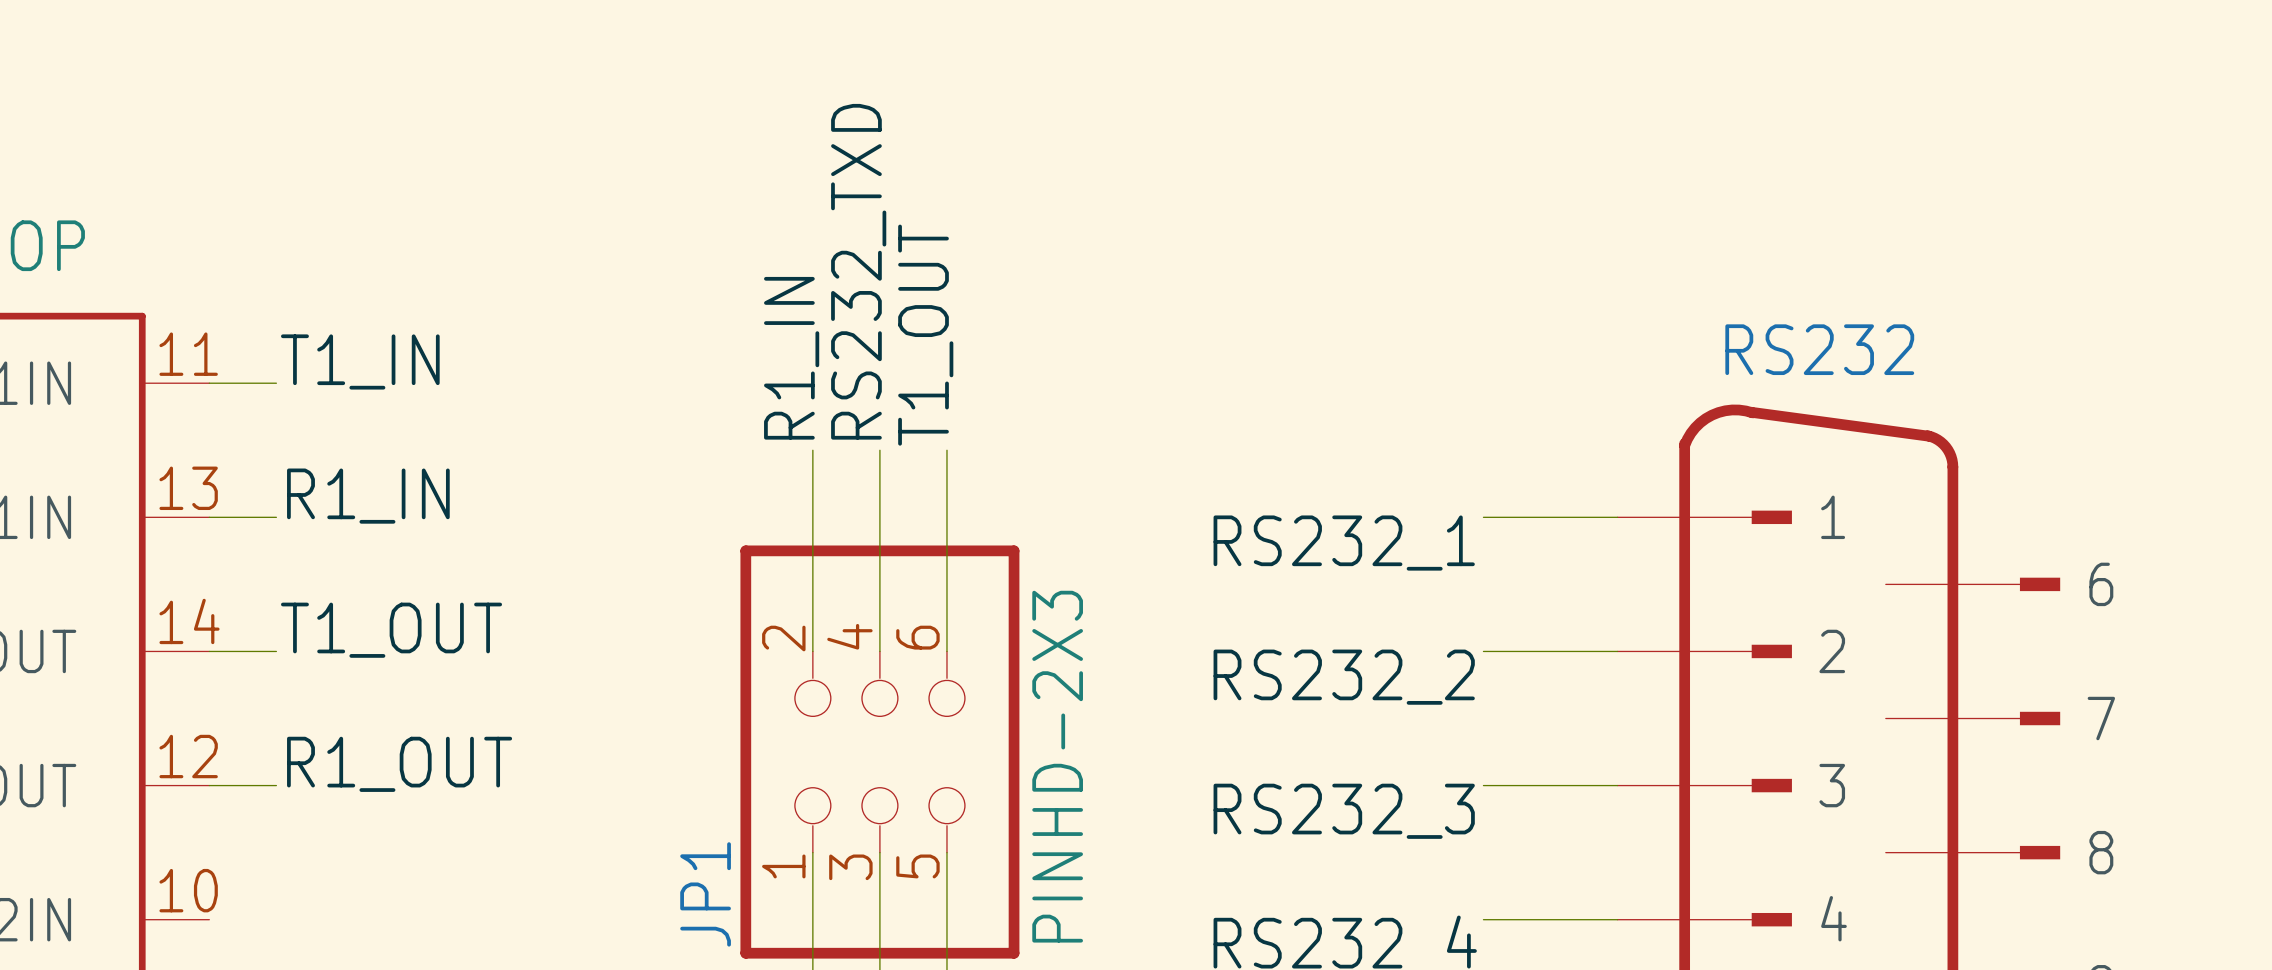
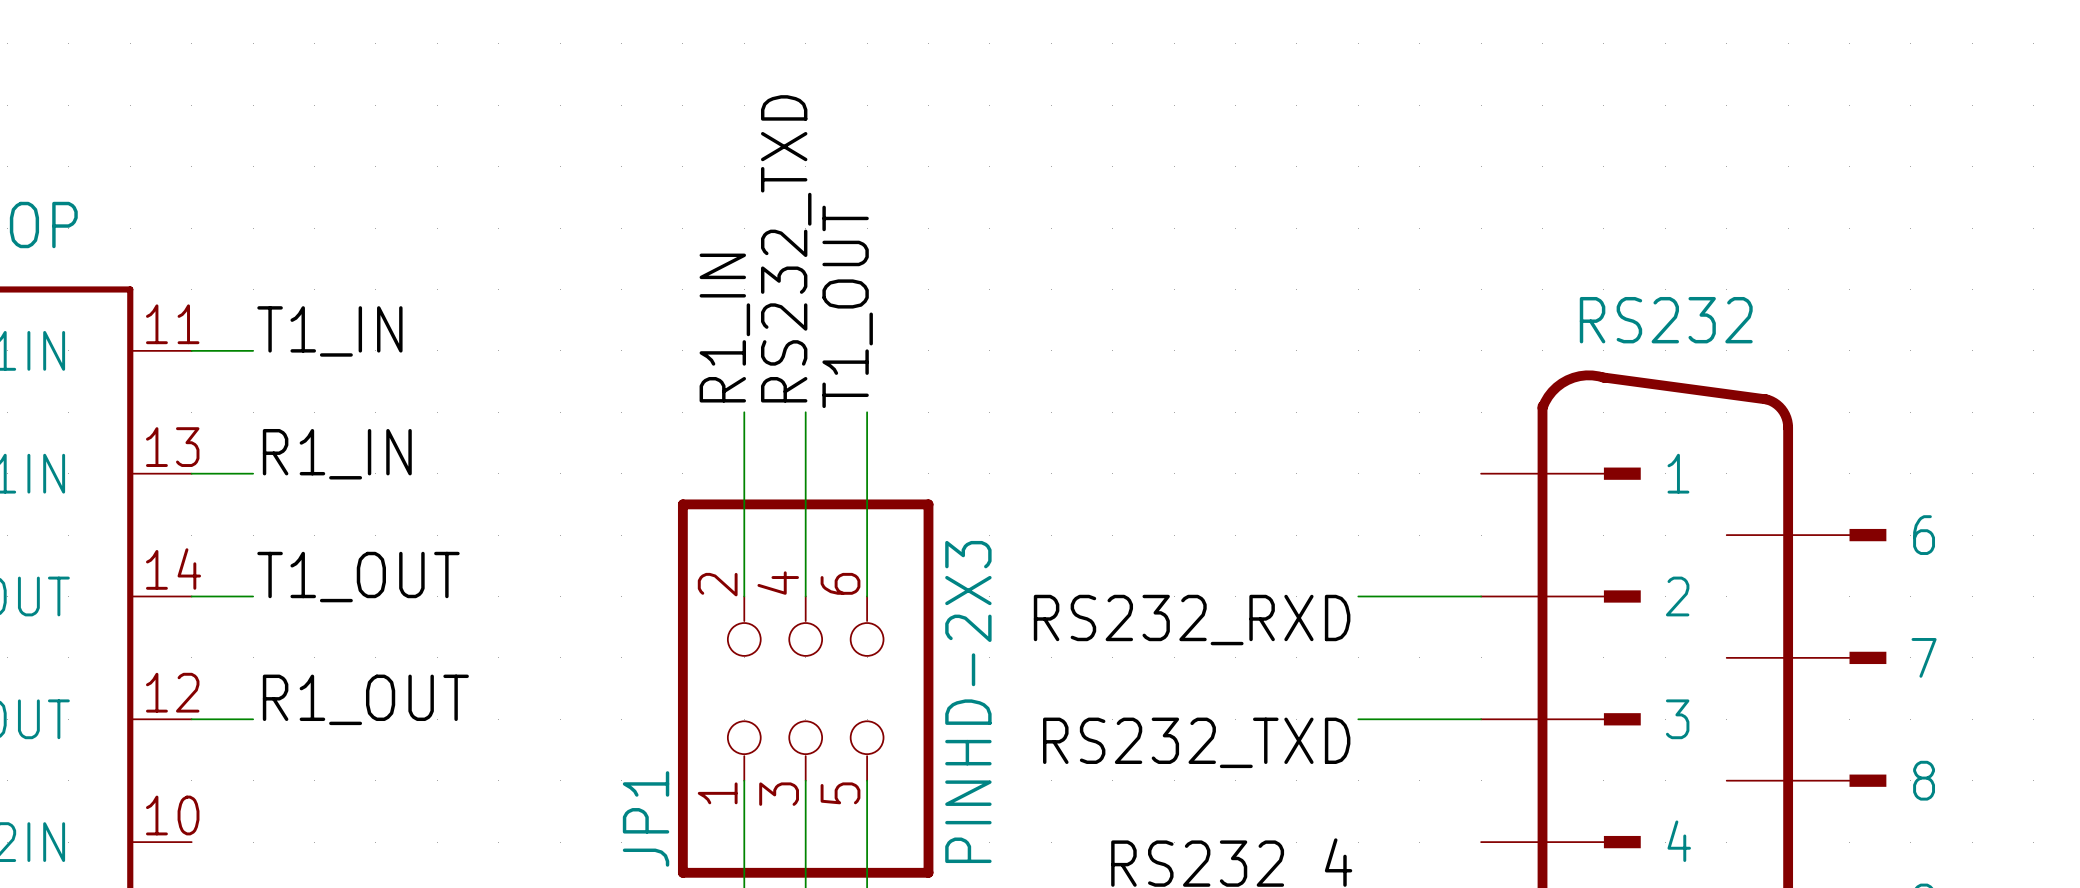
wire: (1483, 517) (1617, 517) -> none
label: RS232_1 (1344, 543) -> none
label: RS232_2 (1344, 677) -> RS232_RXD (1192, 620)
label: RS232_3 (1344, 811) -> RS232_TXD (1196, 742)
wire: (1483, 919) (1617, 919) -> none

